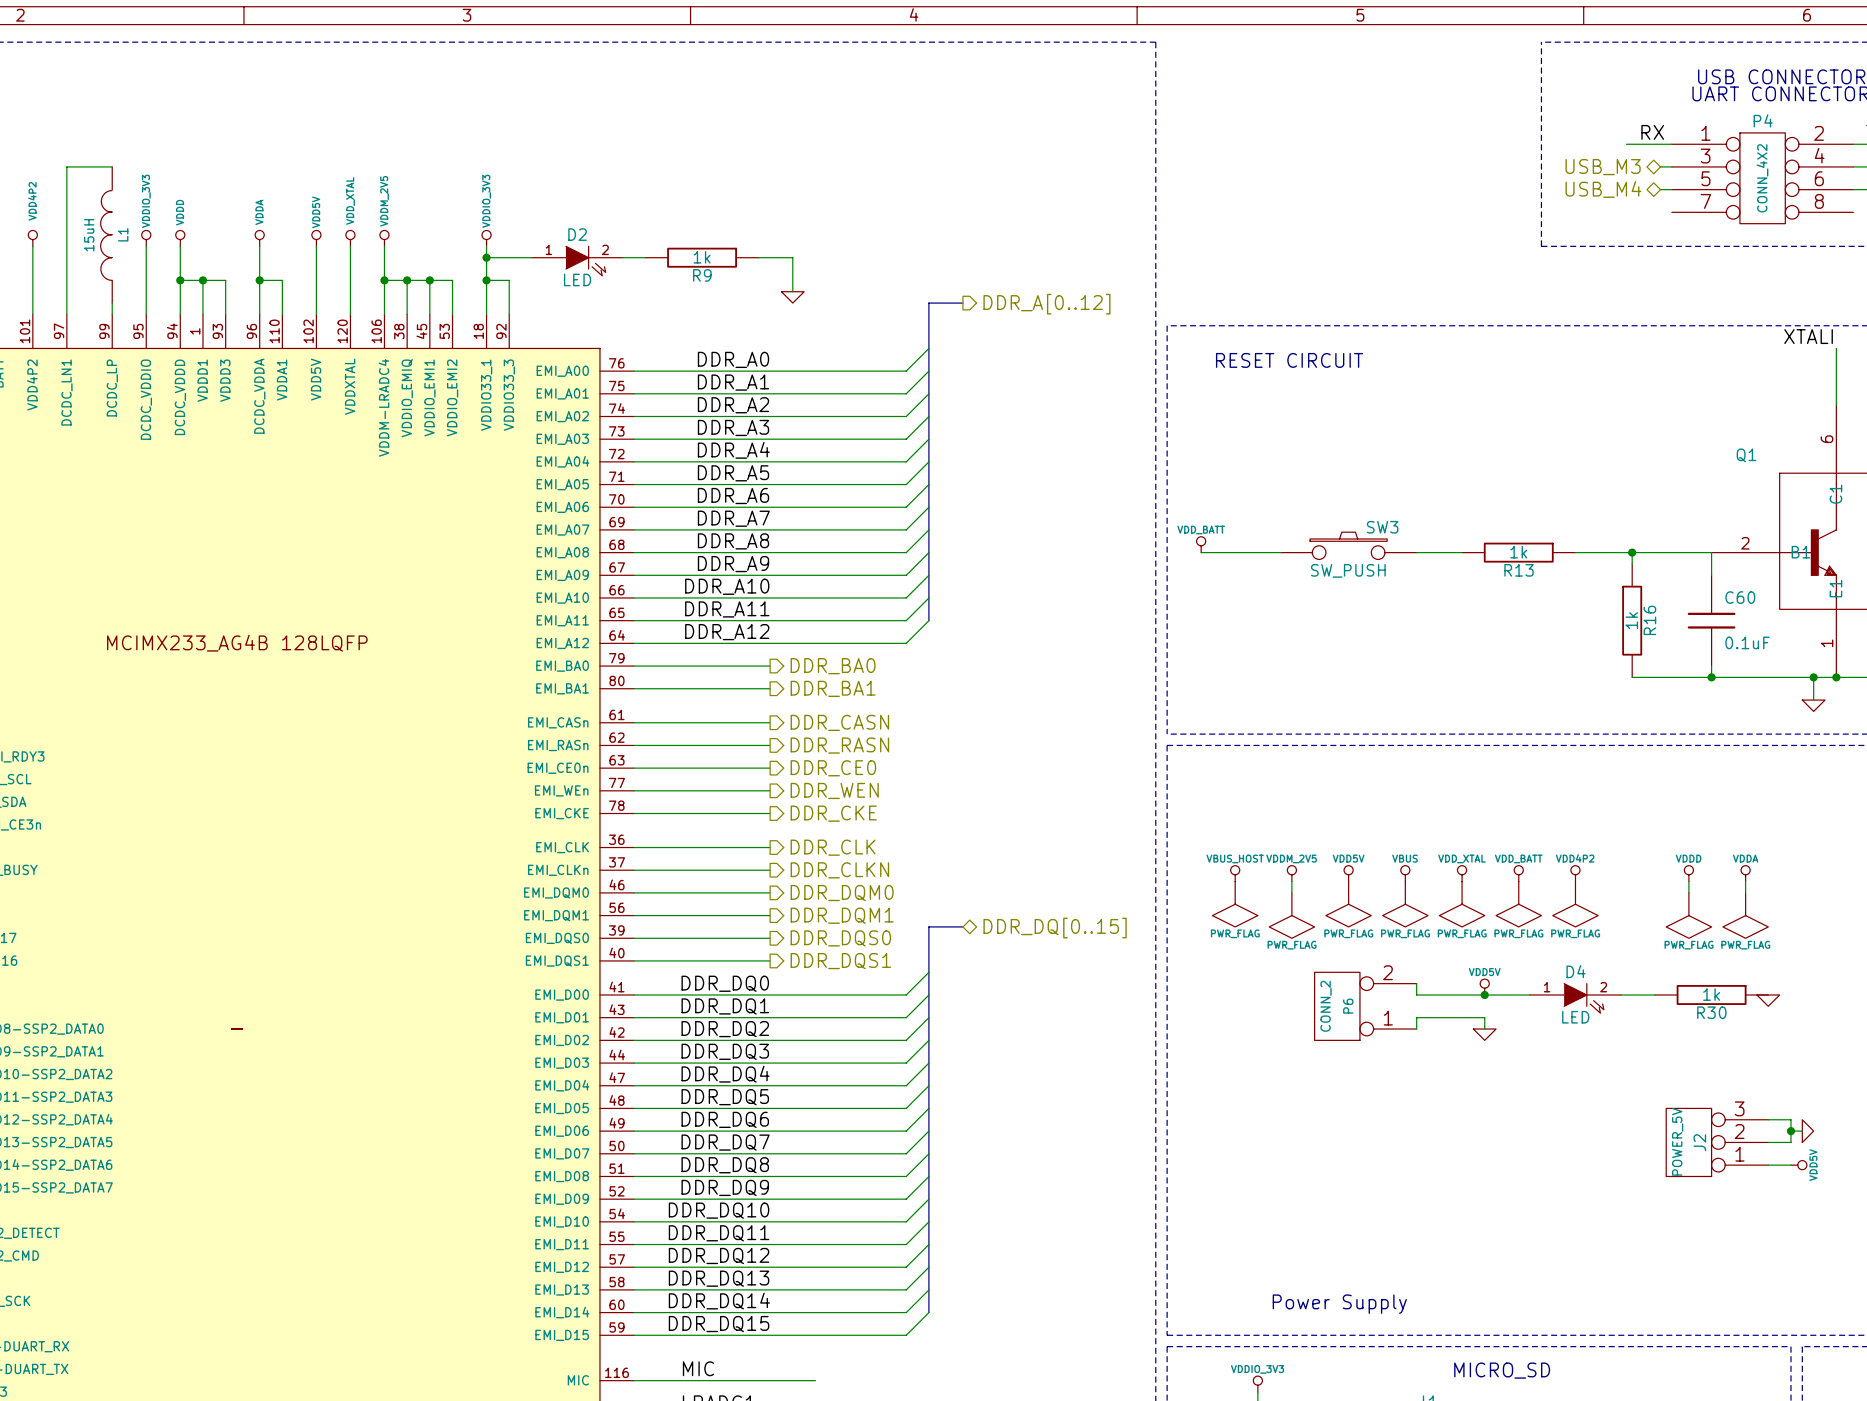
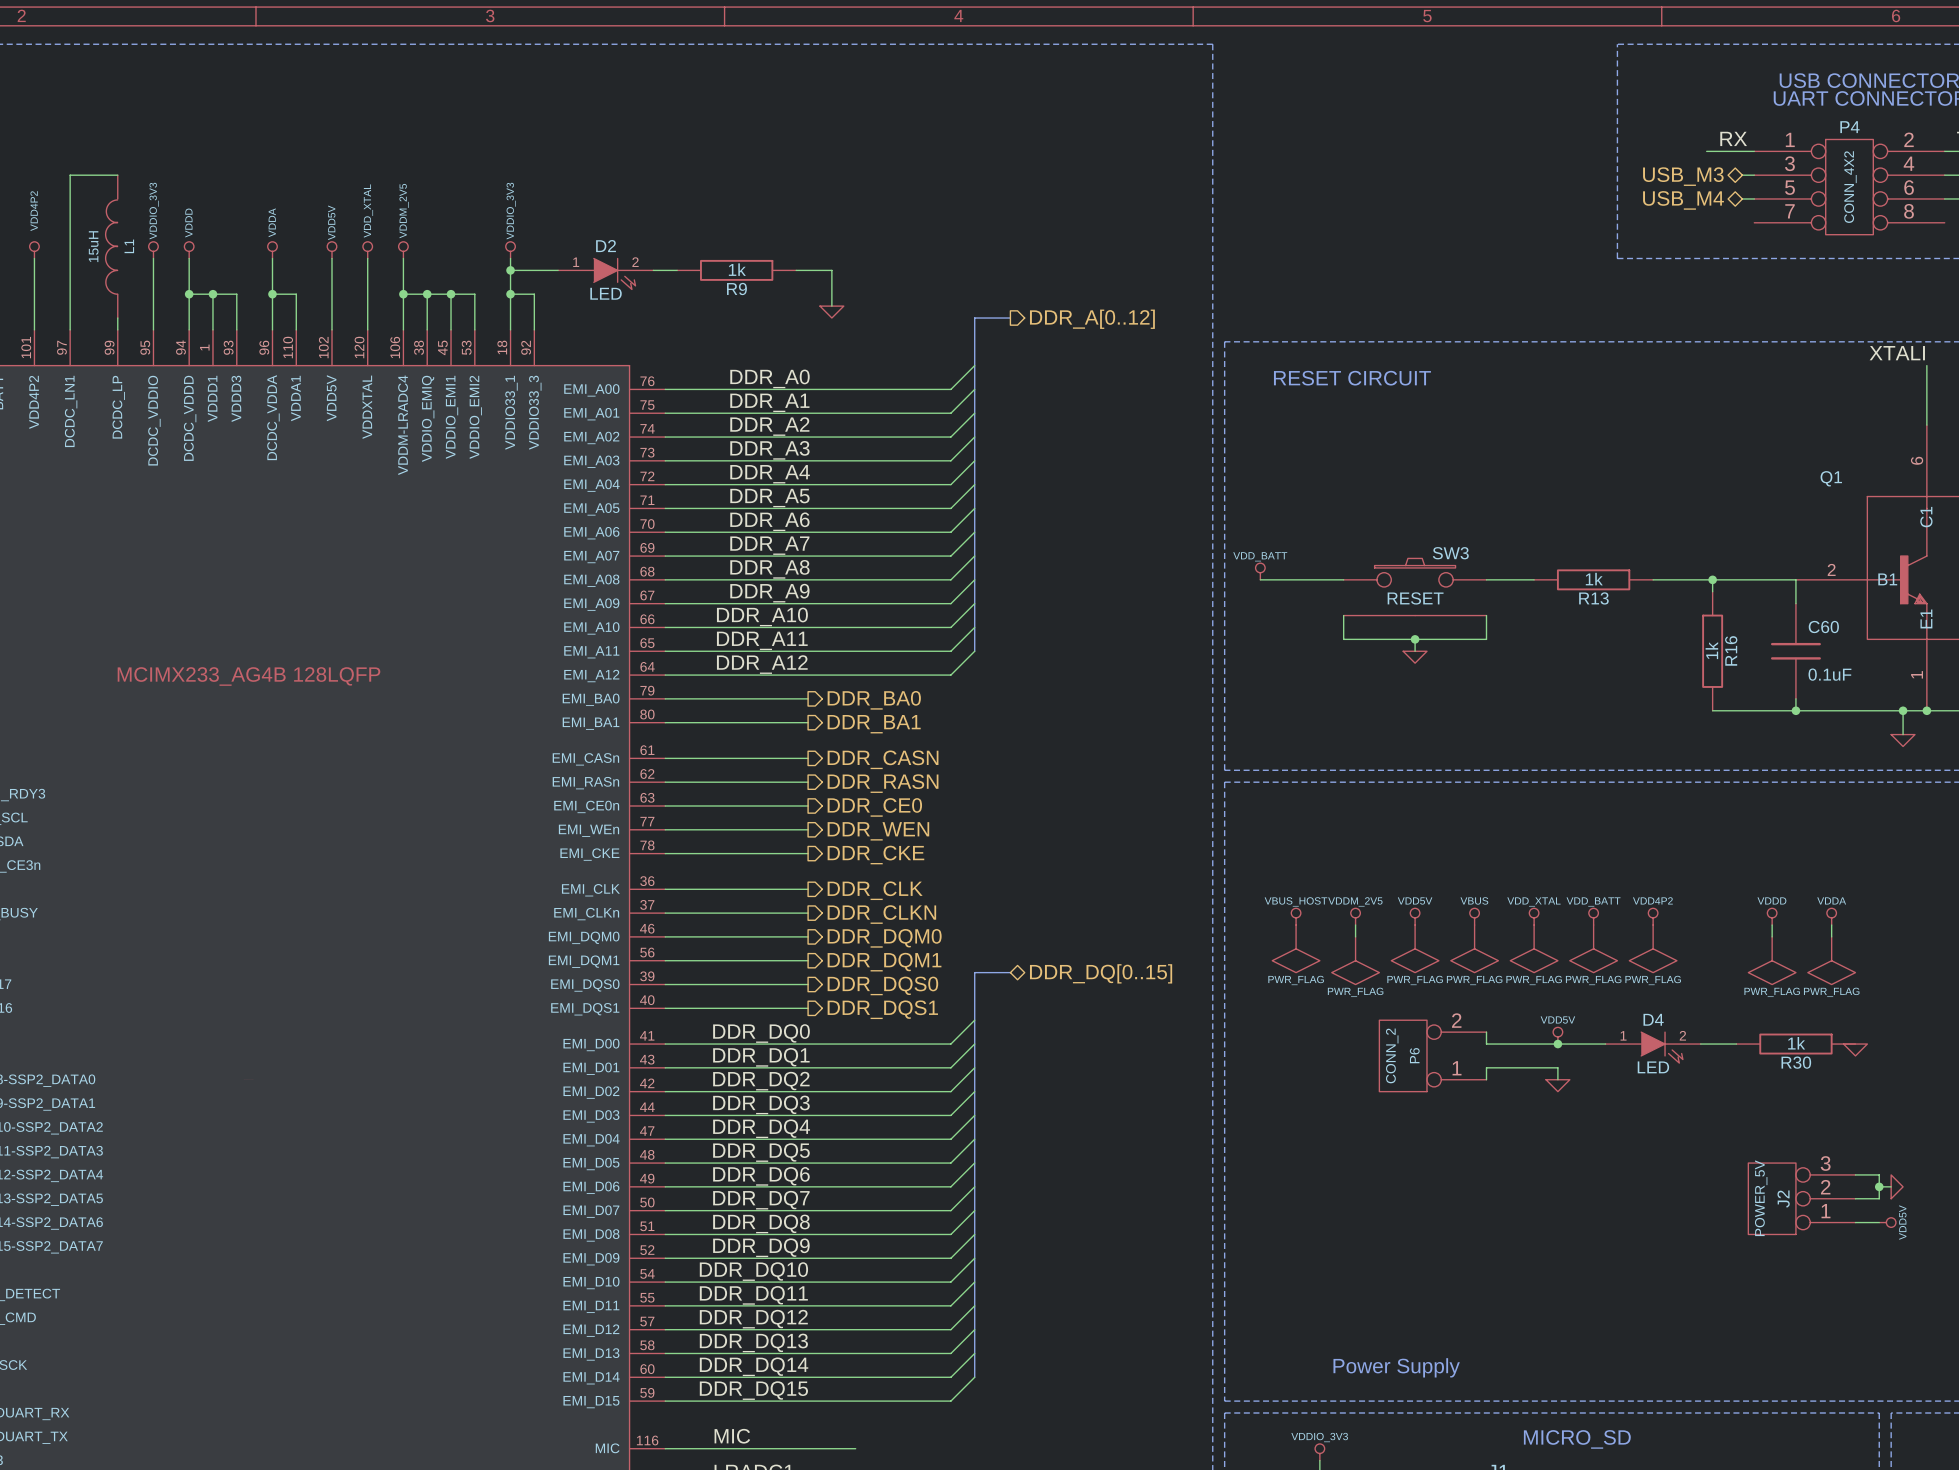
SW3 symbol: [1280, 532, 1417, 560] -> [1343, 558, 1487, 616]
SW3 value: SW_PUSH (1348, 570) -> RESET (1415, 598)
wire: none -> (1343, 615) (1343, 639) (1486, 639) (1486, 615)
wire: none -> (1415, 639) (1415, 651)
junction: none -> (1415, 639)
power symbol: none -> (1415, 657)

